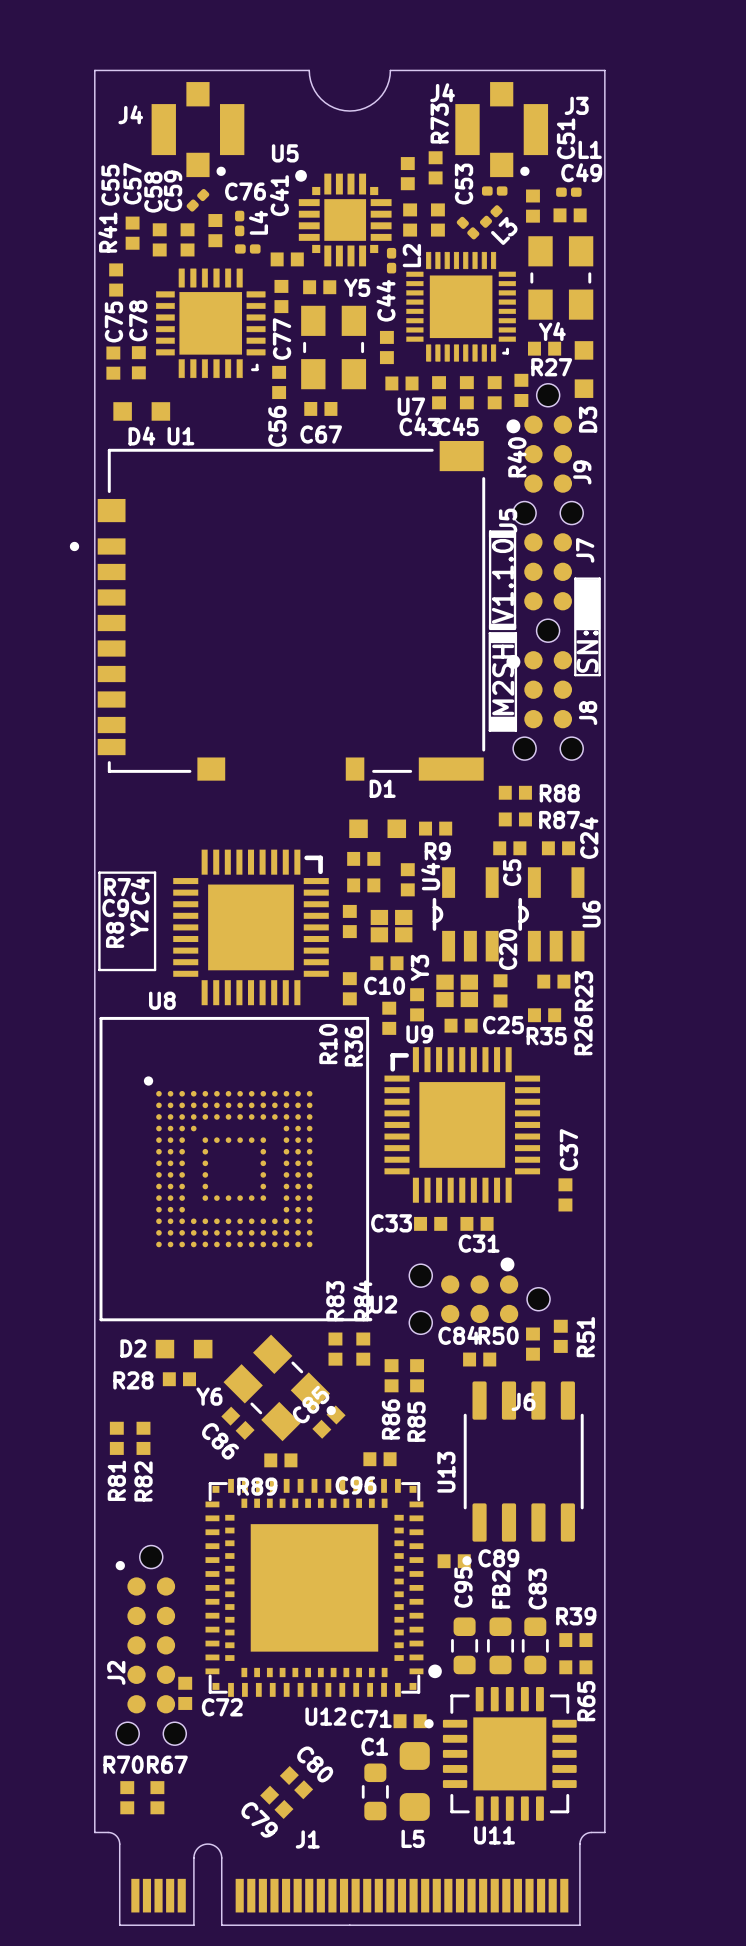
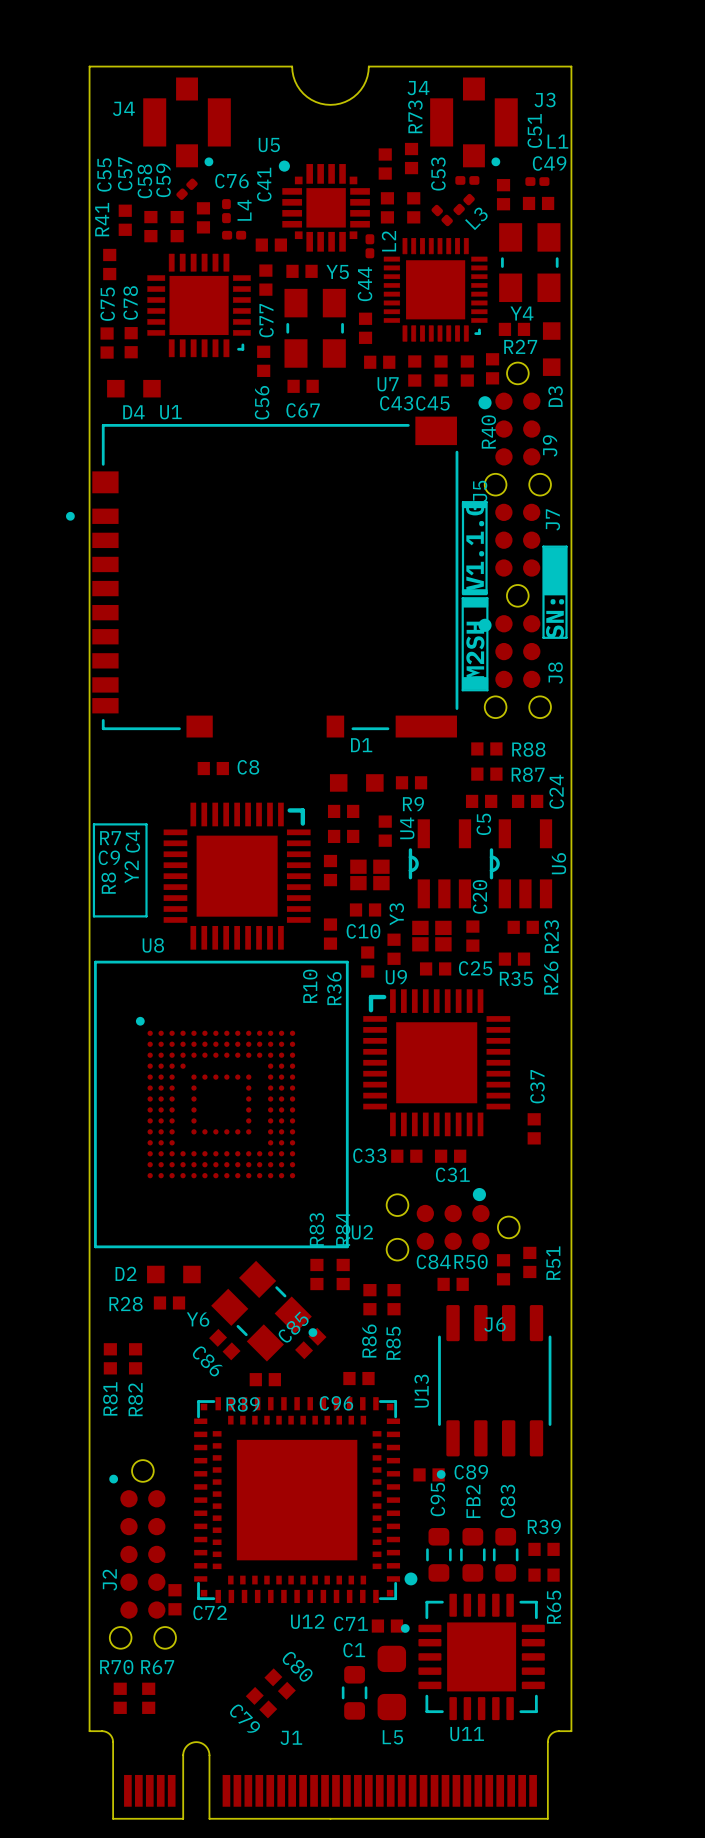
C8: none -> (213, 768)

